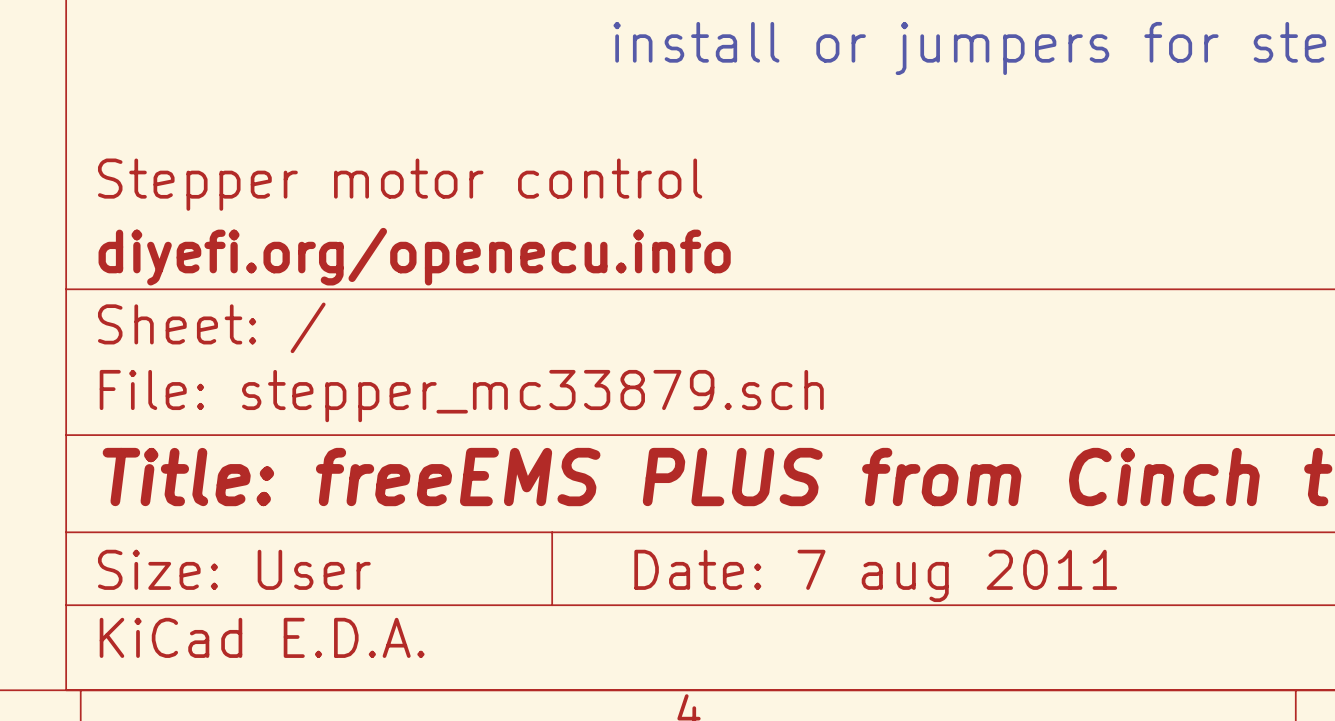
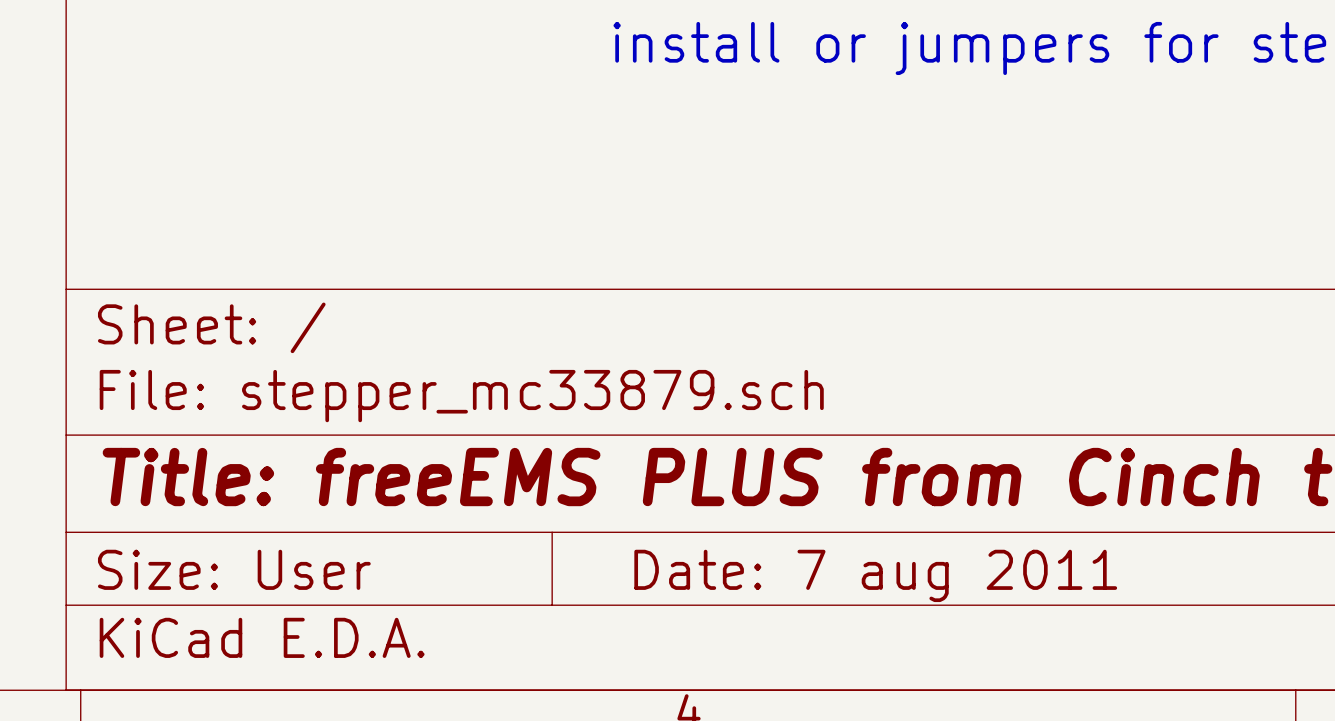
title block: Stepper motor control (400, 184) -> none
title block: diyefi.org/openecu.info (414, 256) -> none

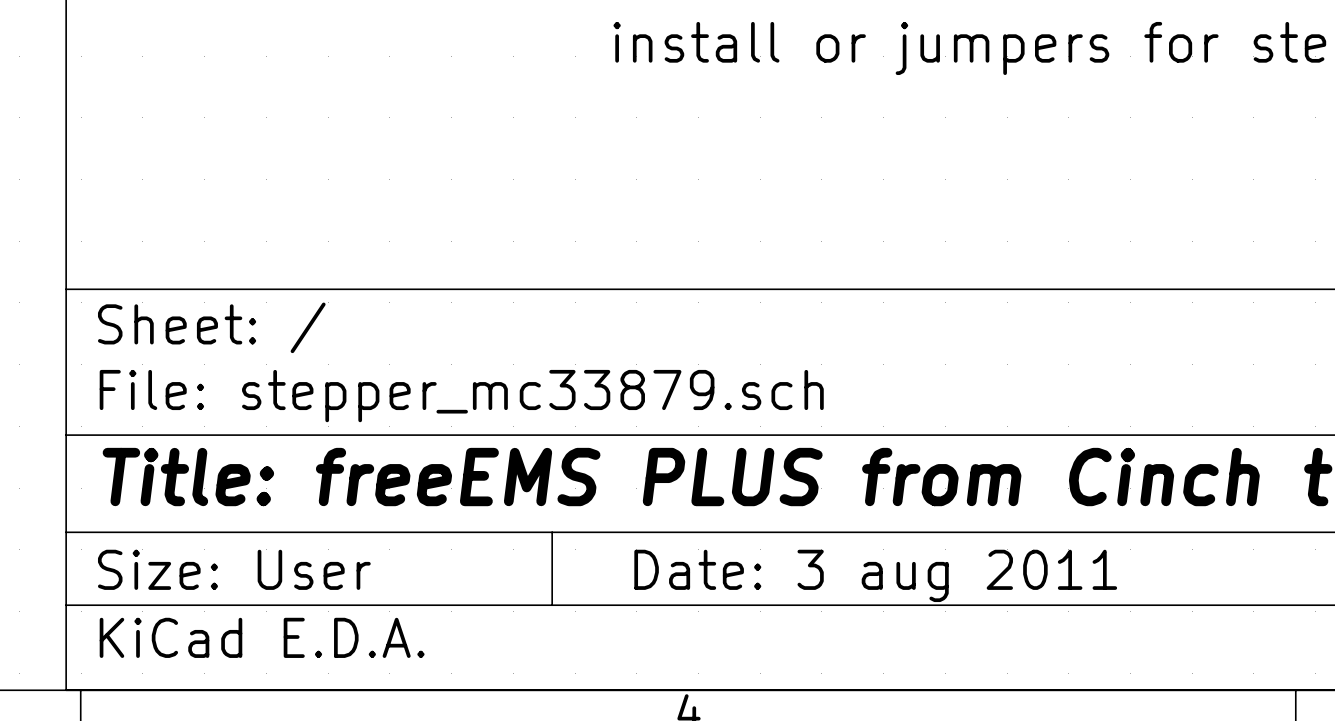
title block: Date: 7 aug 2011 (875, 575) -> Date: 3 aug 2011 (875, 575)

